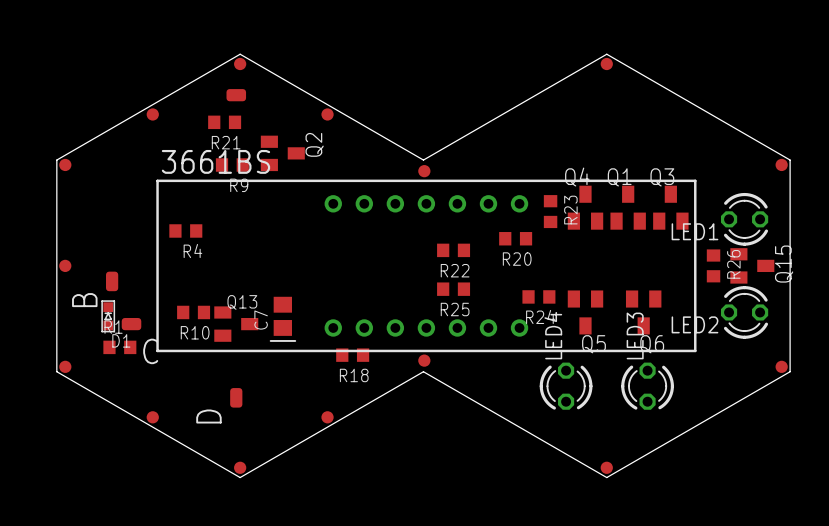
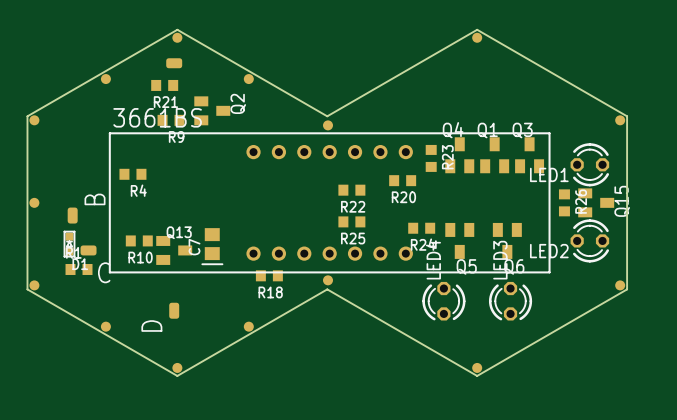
B name position: B (84, 300) -> B (95, 199)

